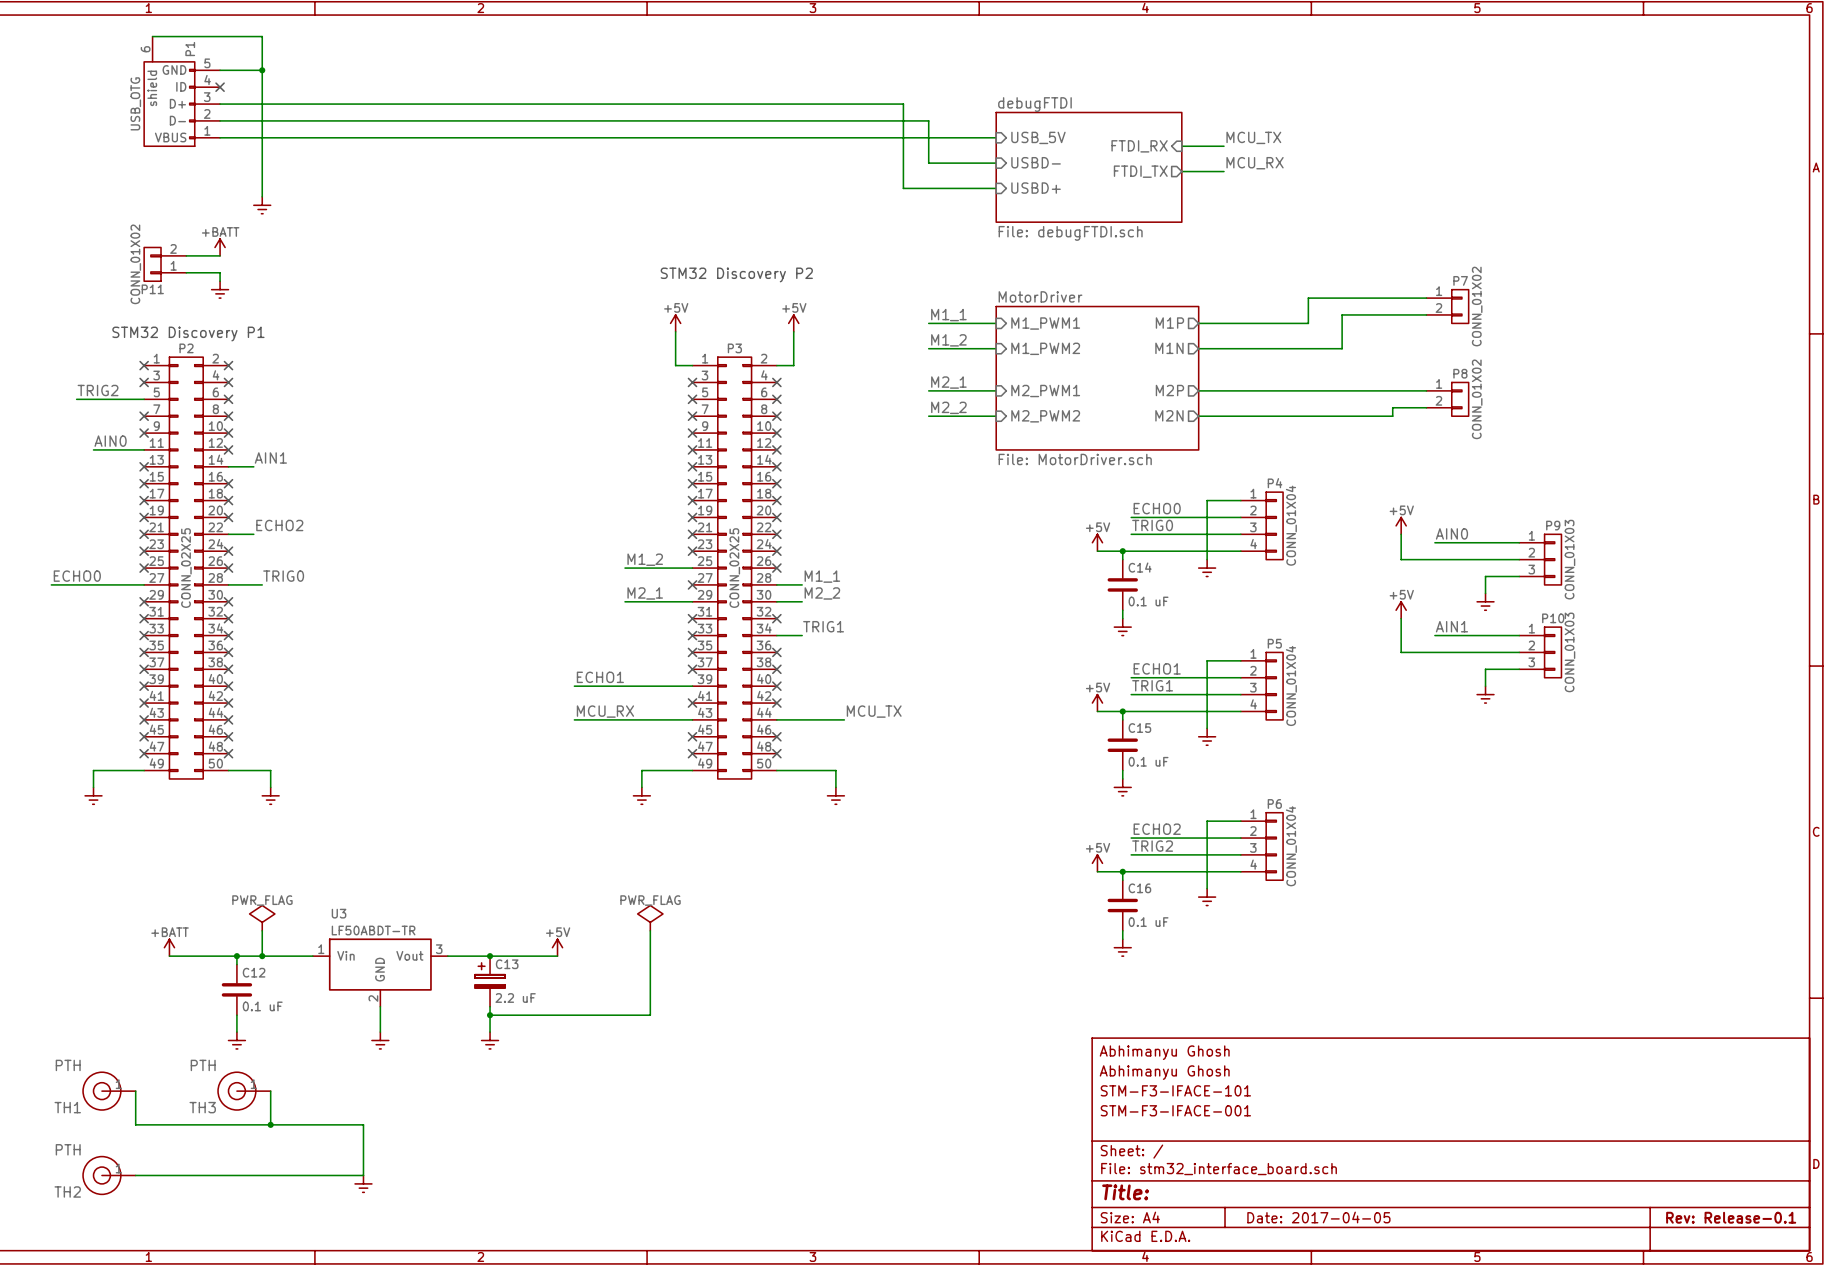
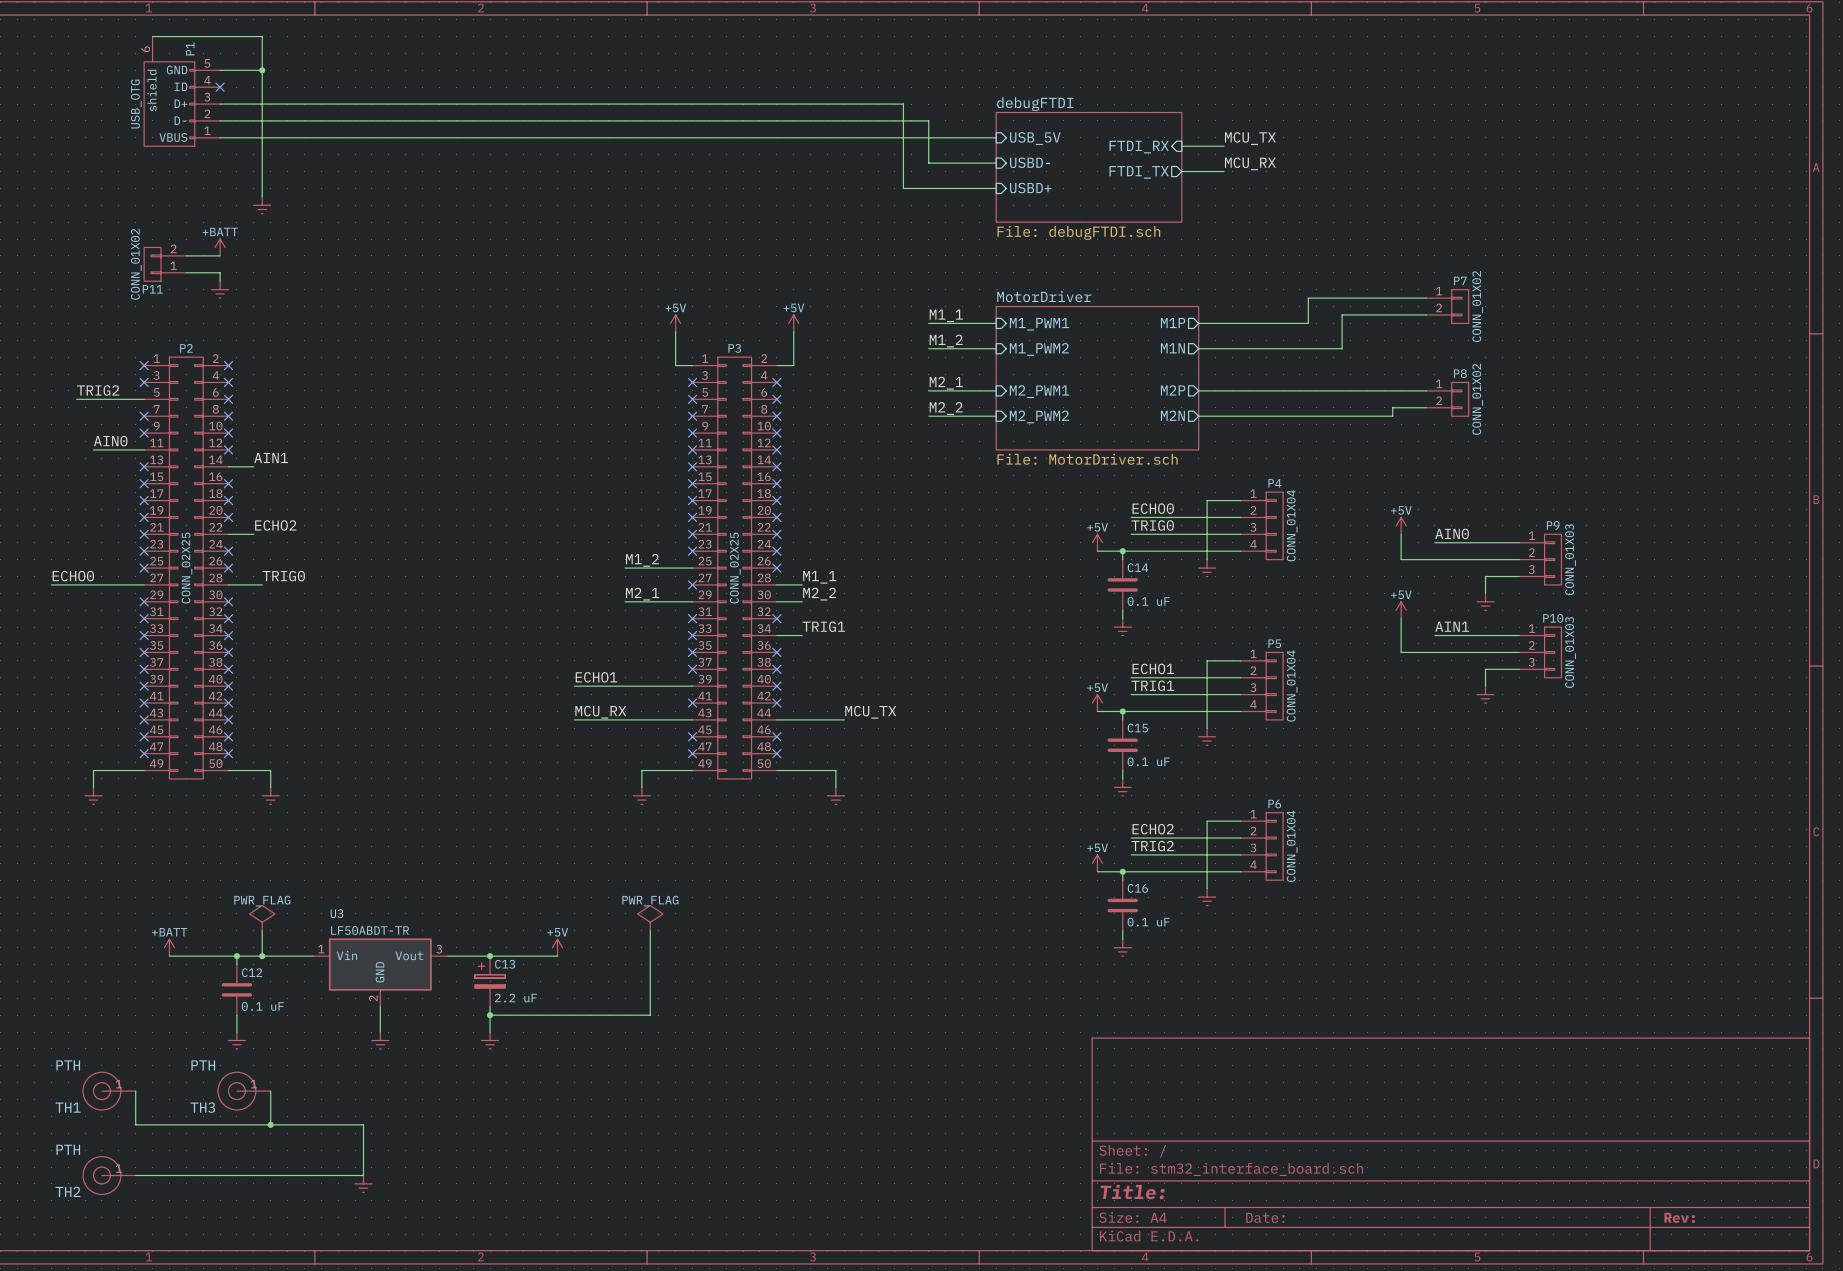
text: STM32 Discovery P2 (736, 274) -> none
text: STM32 Discovery P1 (188, 334) -> none
title block: Abhimanyu Ghosh (1164, 1052) -> none
title block: Abhimanyu Ghosh (1164, 1072) -> none
title block: STM-F3-IFACE-101 (1175, 1090) -> none
title block: STM-F3-IFACE-001 (1175, 1110) -> none
title block: Date: 2017-04-05 (1318, 1217) -> Date: (1265, 1217)
title block: Rev: Release-0.1 (1731, 1217) -> Rev: (1679, 1217)

